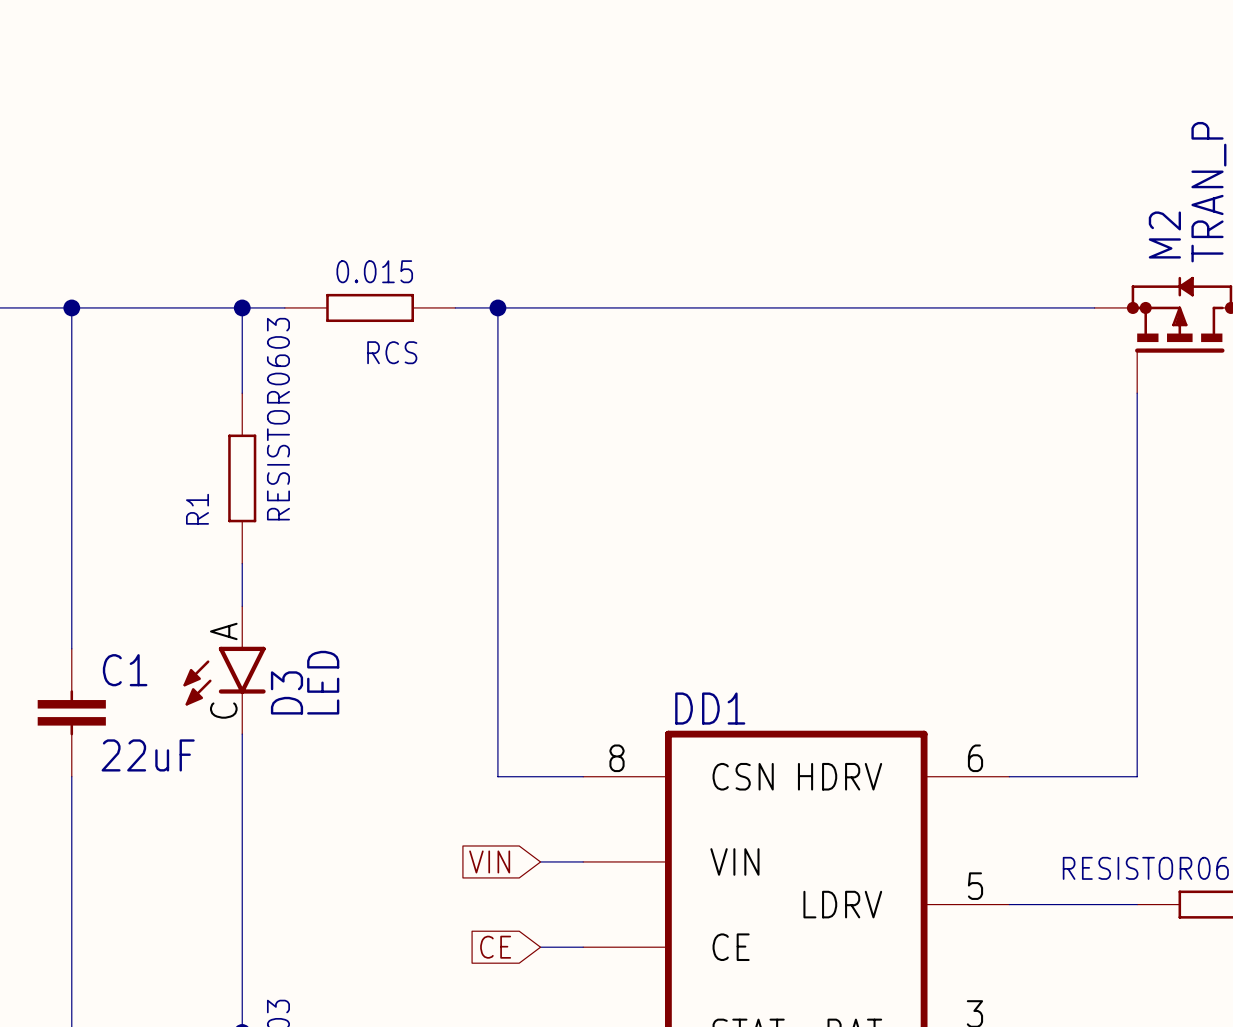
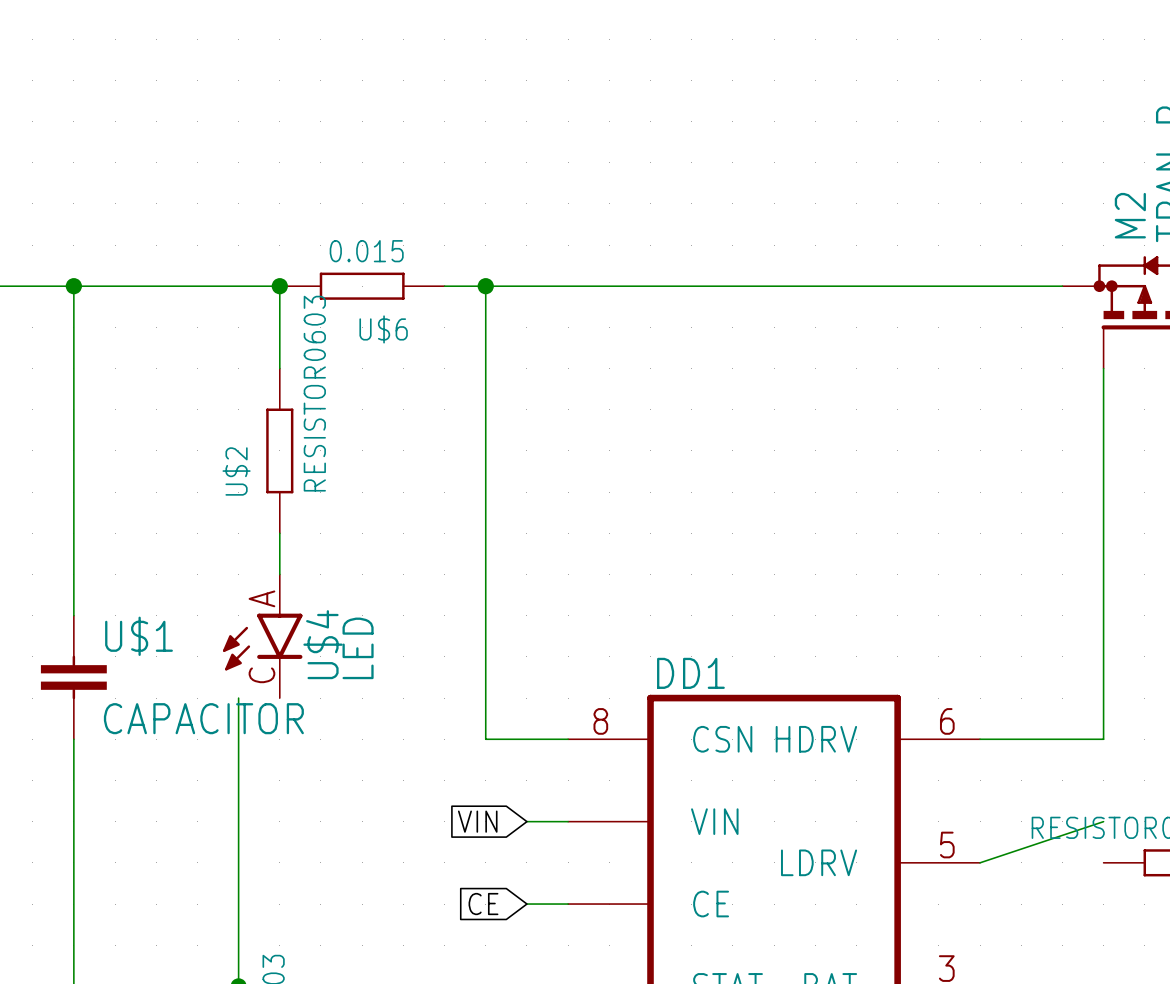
wire: (242, 307) (242, 393) -> (279, 286) (279, 368)
junction position: (242, 307) -> (279, 286)
RCS name: RCS (392, 352) -> U$6 (383, 329)
R1: RESISTOR0603 (242, 478) -> none
U$2: none -> RESISTOR0603 (279, 450)
wire: (242, 563) (242, 606) -> (279, 533) (279, 574)
C1 name: C1 (125, 670) -> U$1 (139, 636)
D3: LED (224, 670) -> none
U$4: none -> LED (262, 636)
C1 value: 22uF (148, 755) -> CAPACITOR (203, 718)
wire: (1009, 904) (1137, 904) -> (980, 862) (1103, 821)

